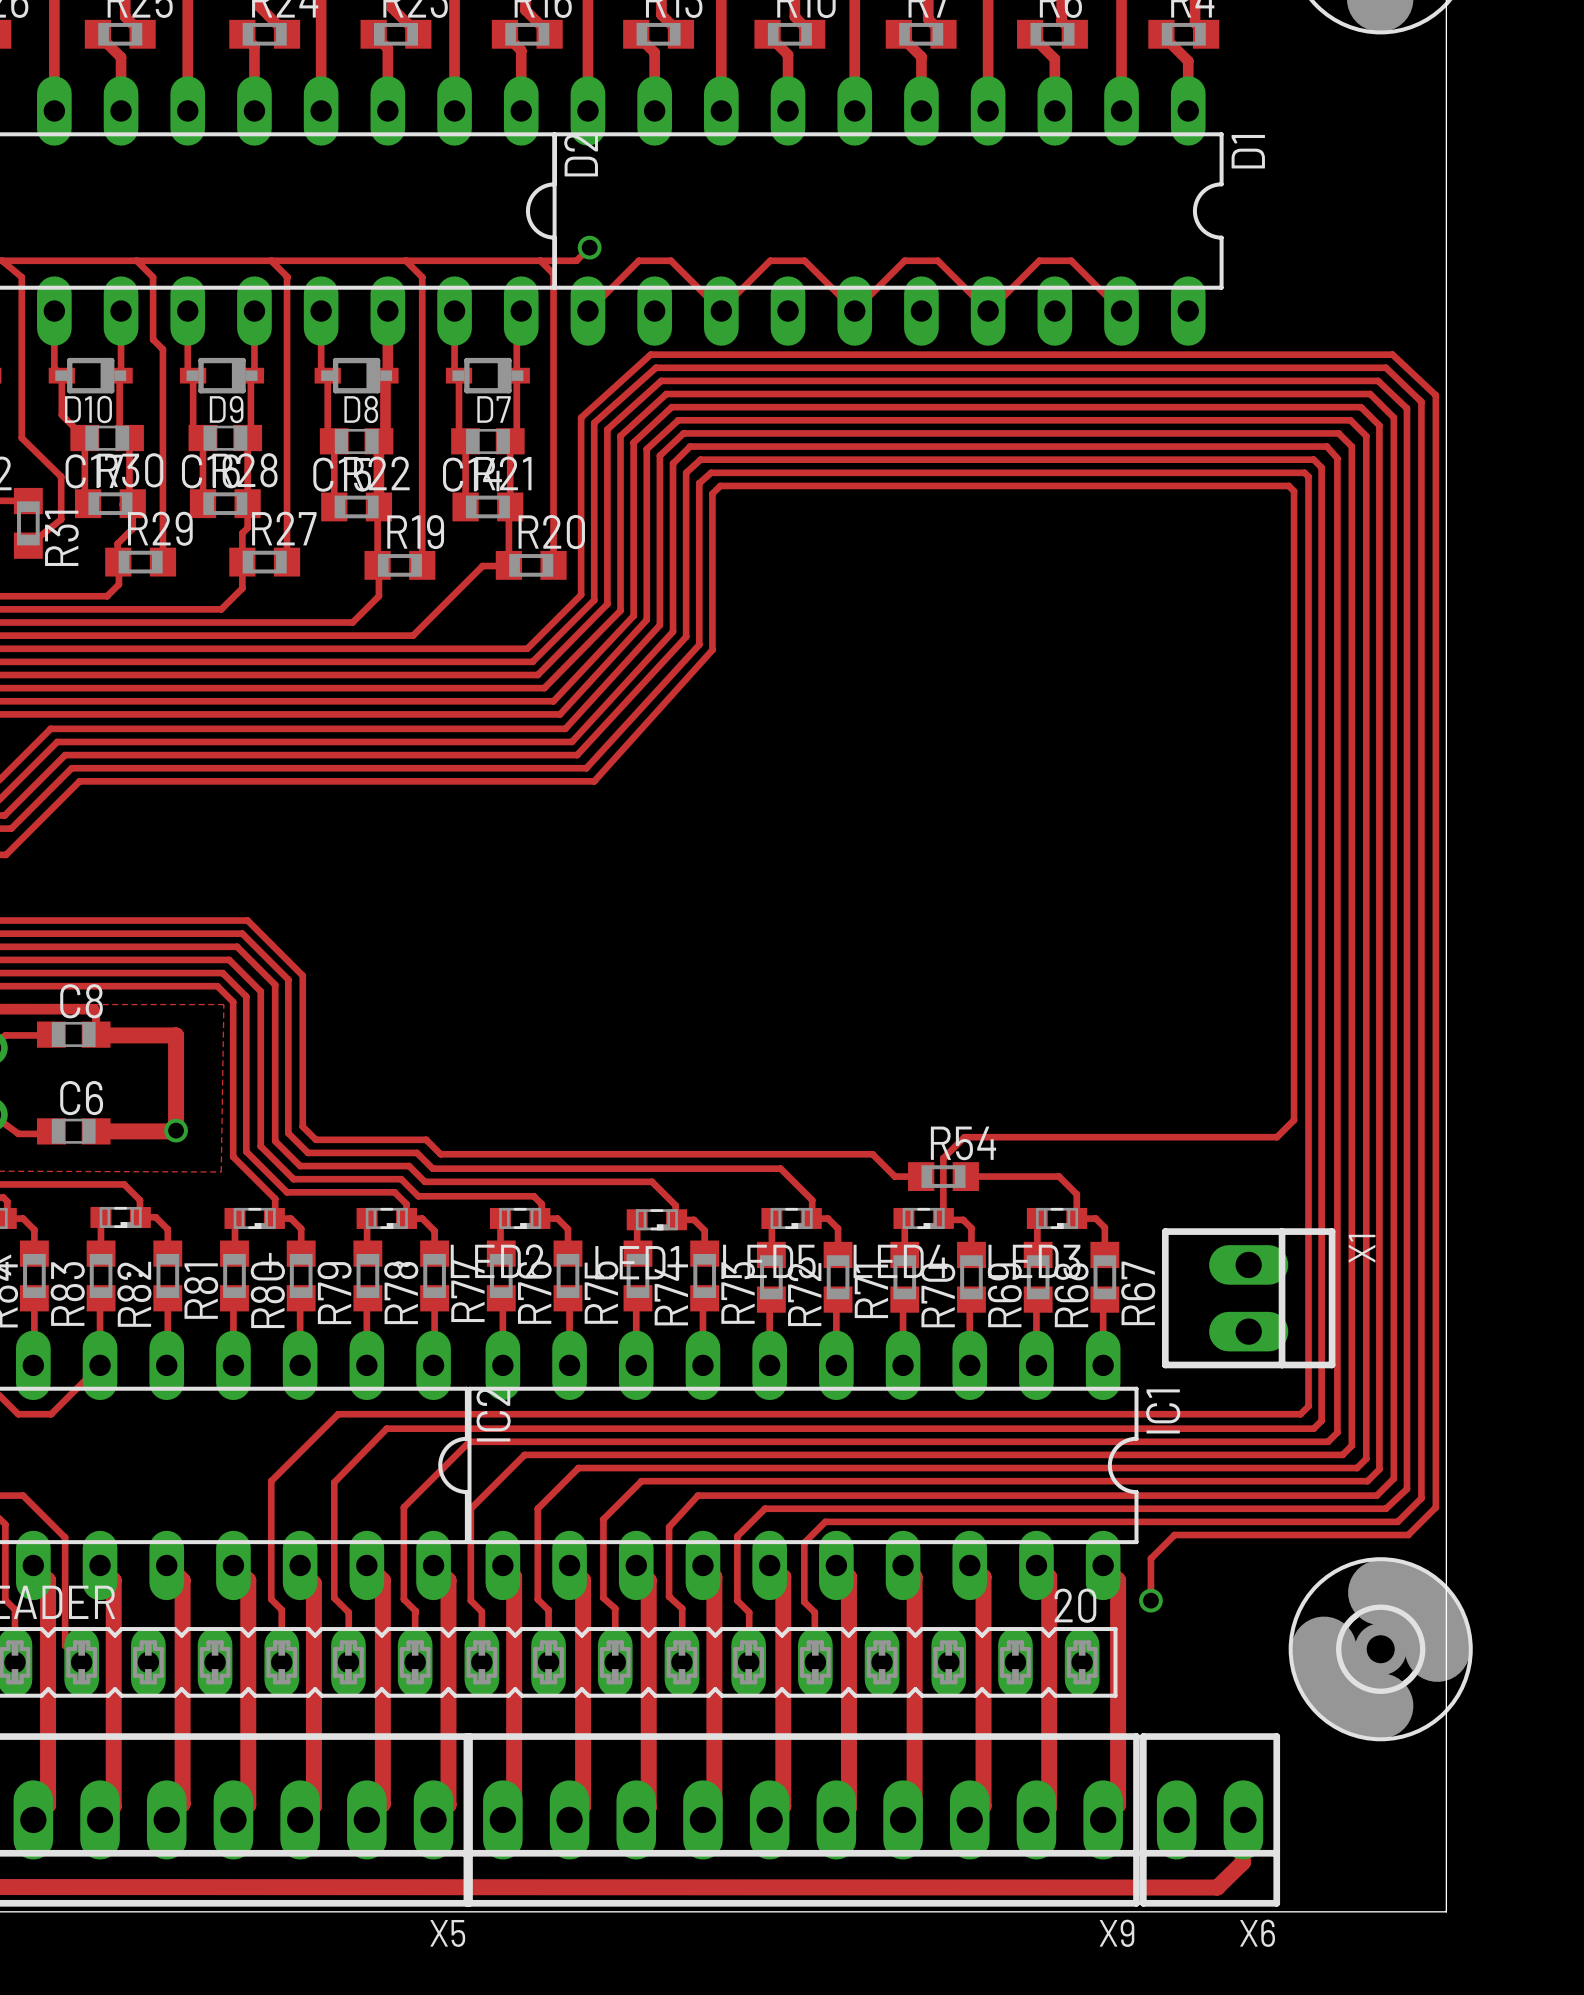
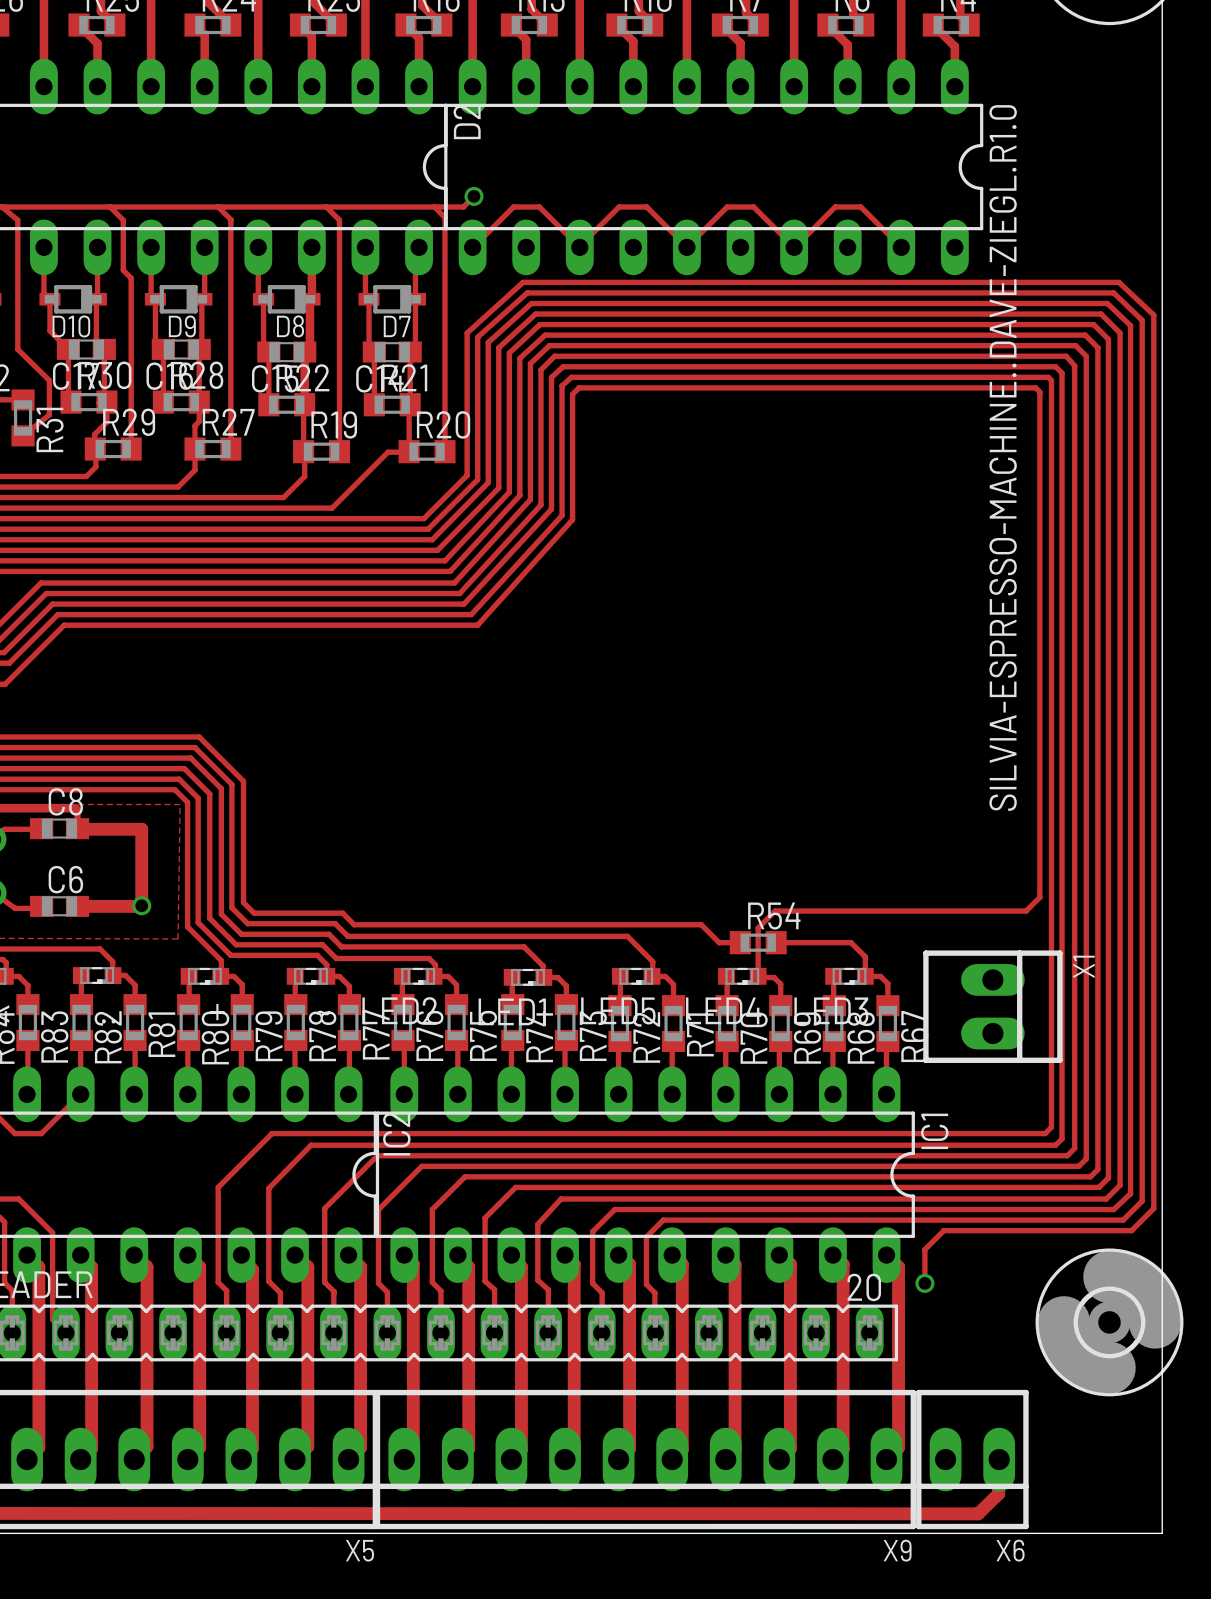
D1 name: D1 (1248, 151) -> SILVIA-ESPRESSO-MACHINE..DAVE-ZIEGL.R1.0 (1003, 458)
X1 position: (1248, 1298) -> (992, 1006)

